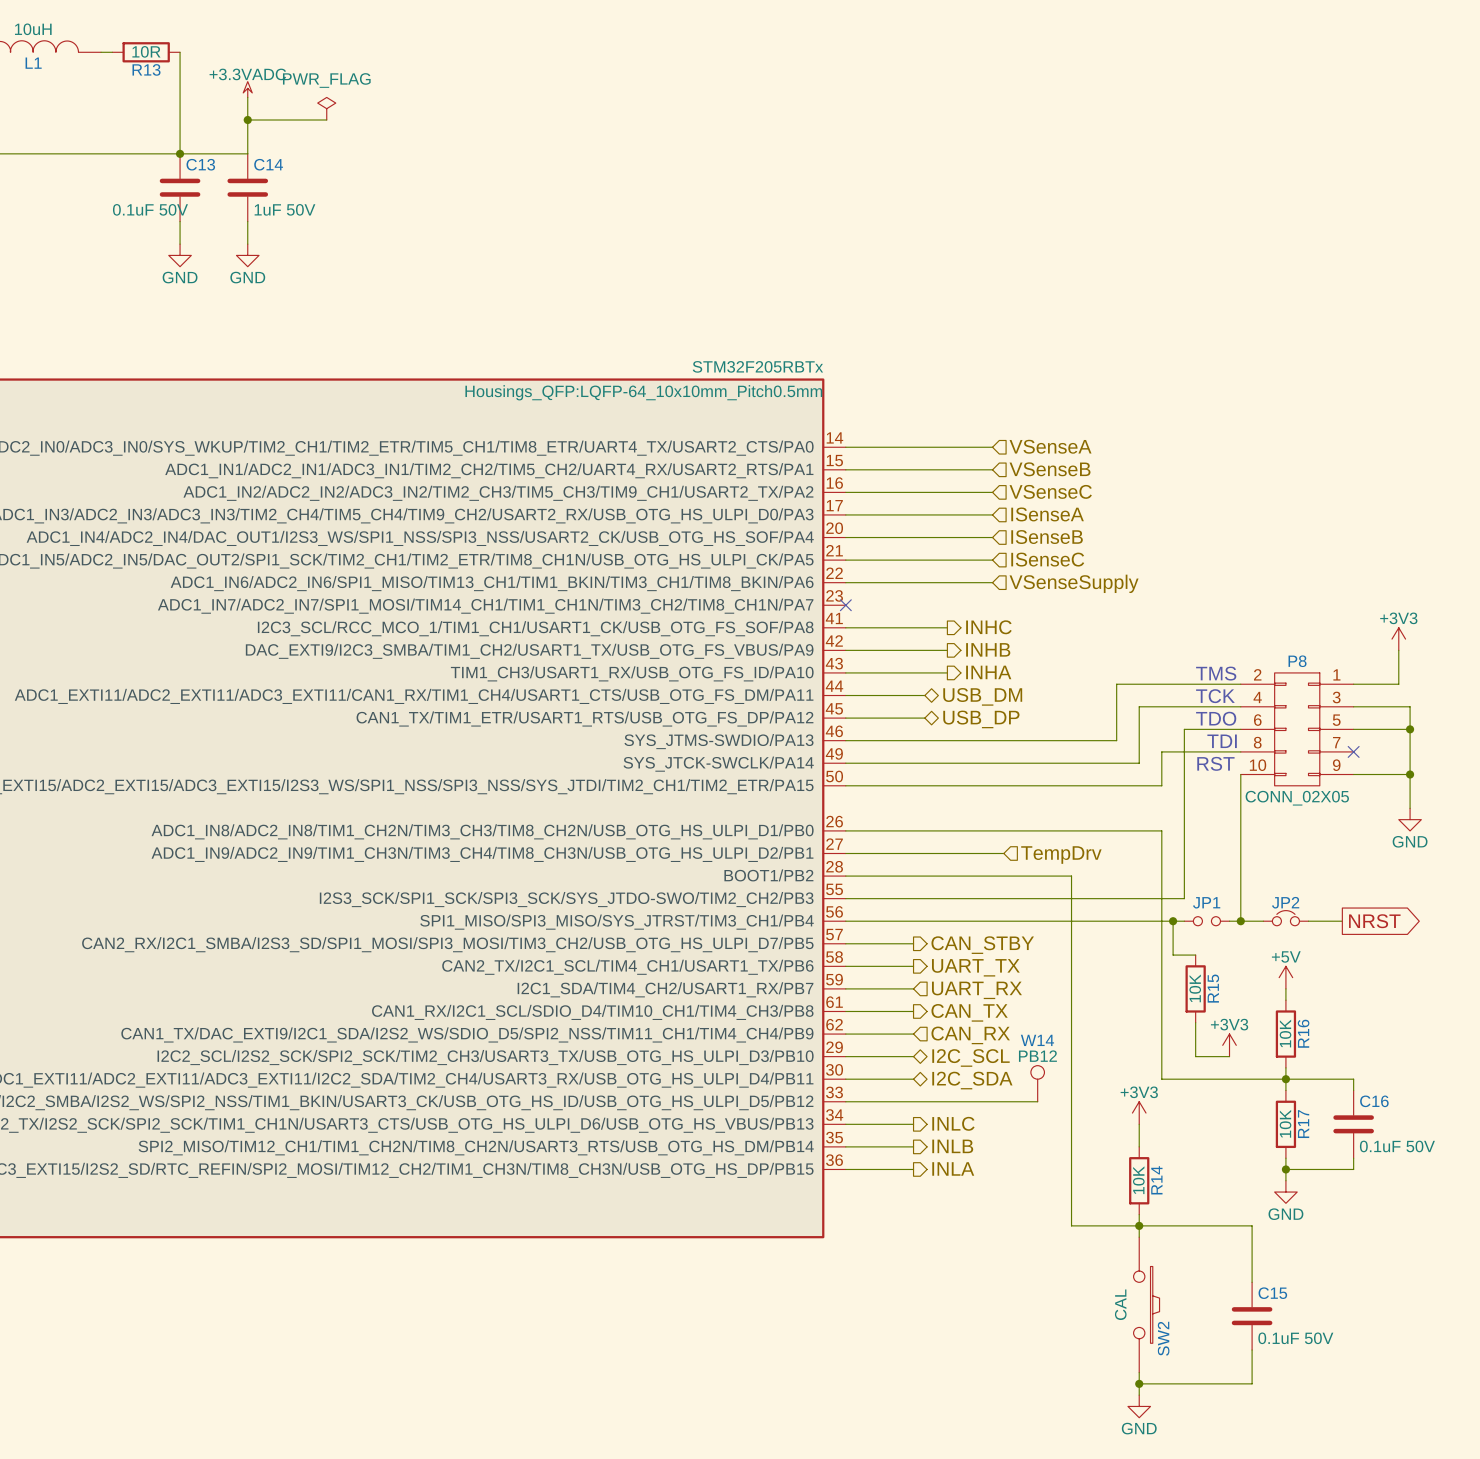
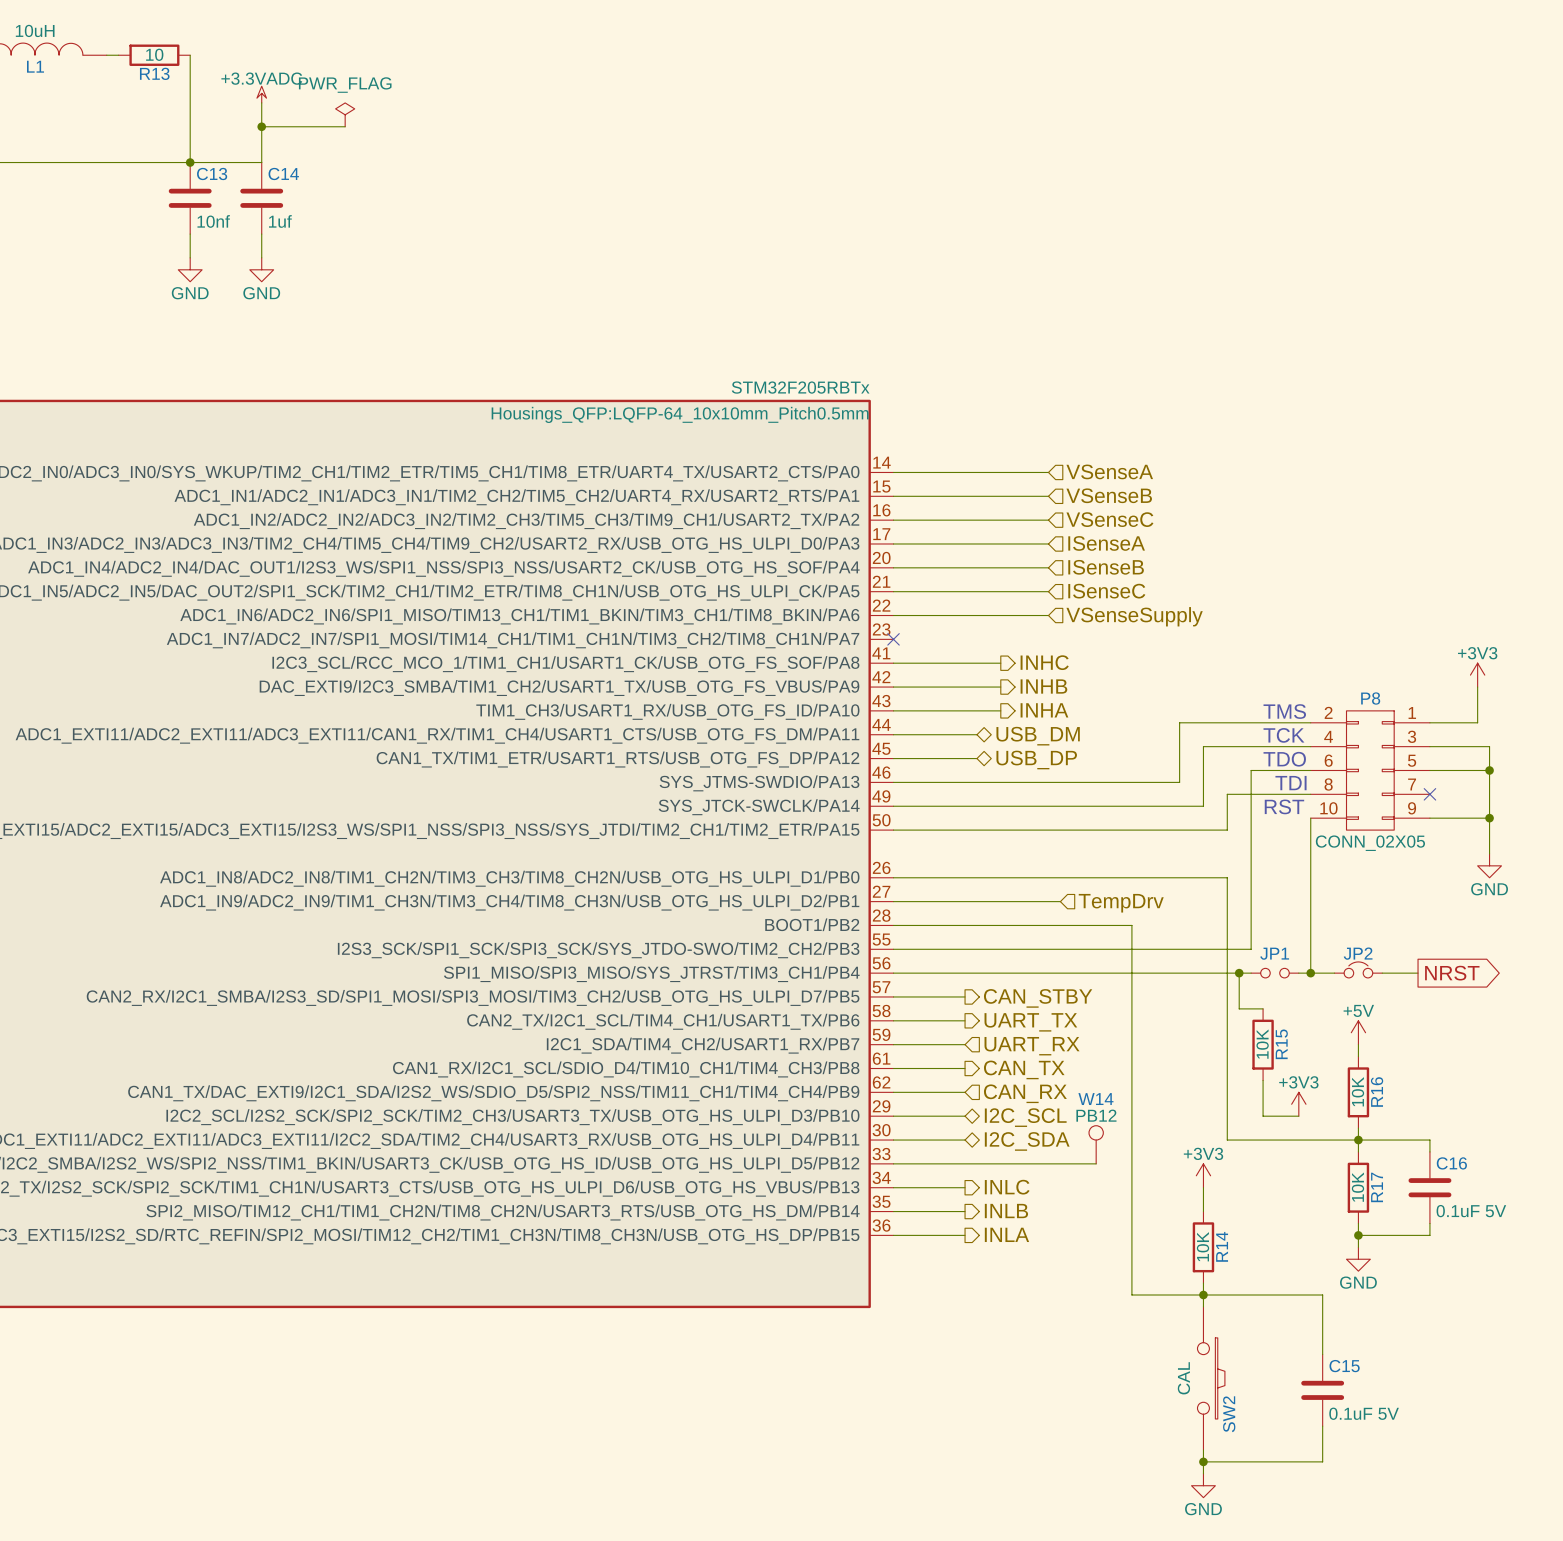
R13 value: 10R (146, 51) -> 10 (154, 54)
C13 value: 0.1uF 50V (150, 209) -> 10nf (213, 221)
C14 value: 1uF 50V (284, 209) -> 1uf (280, 221)
C16 value: 0.1uF 50V (1397, 1146) -> 0.1uF 5V (1471, 1211)
C15 value: 0.1uF 50V (1295, 1338) -> 0.1uF 5V (1364, 1413)

